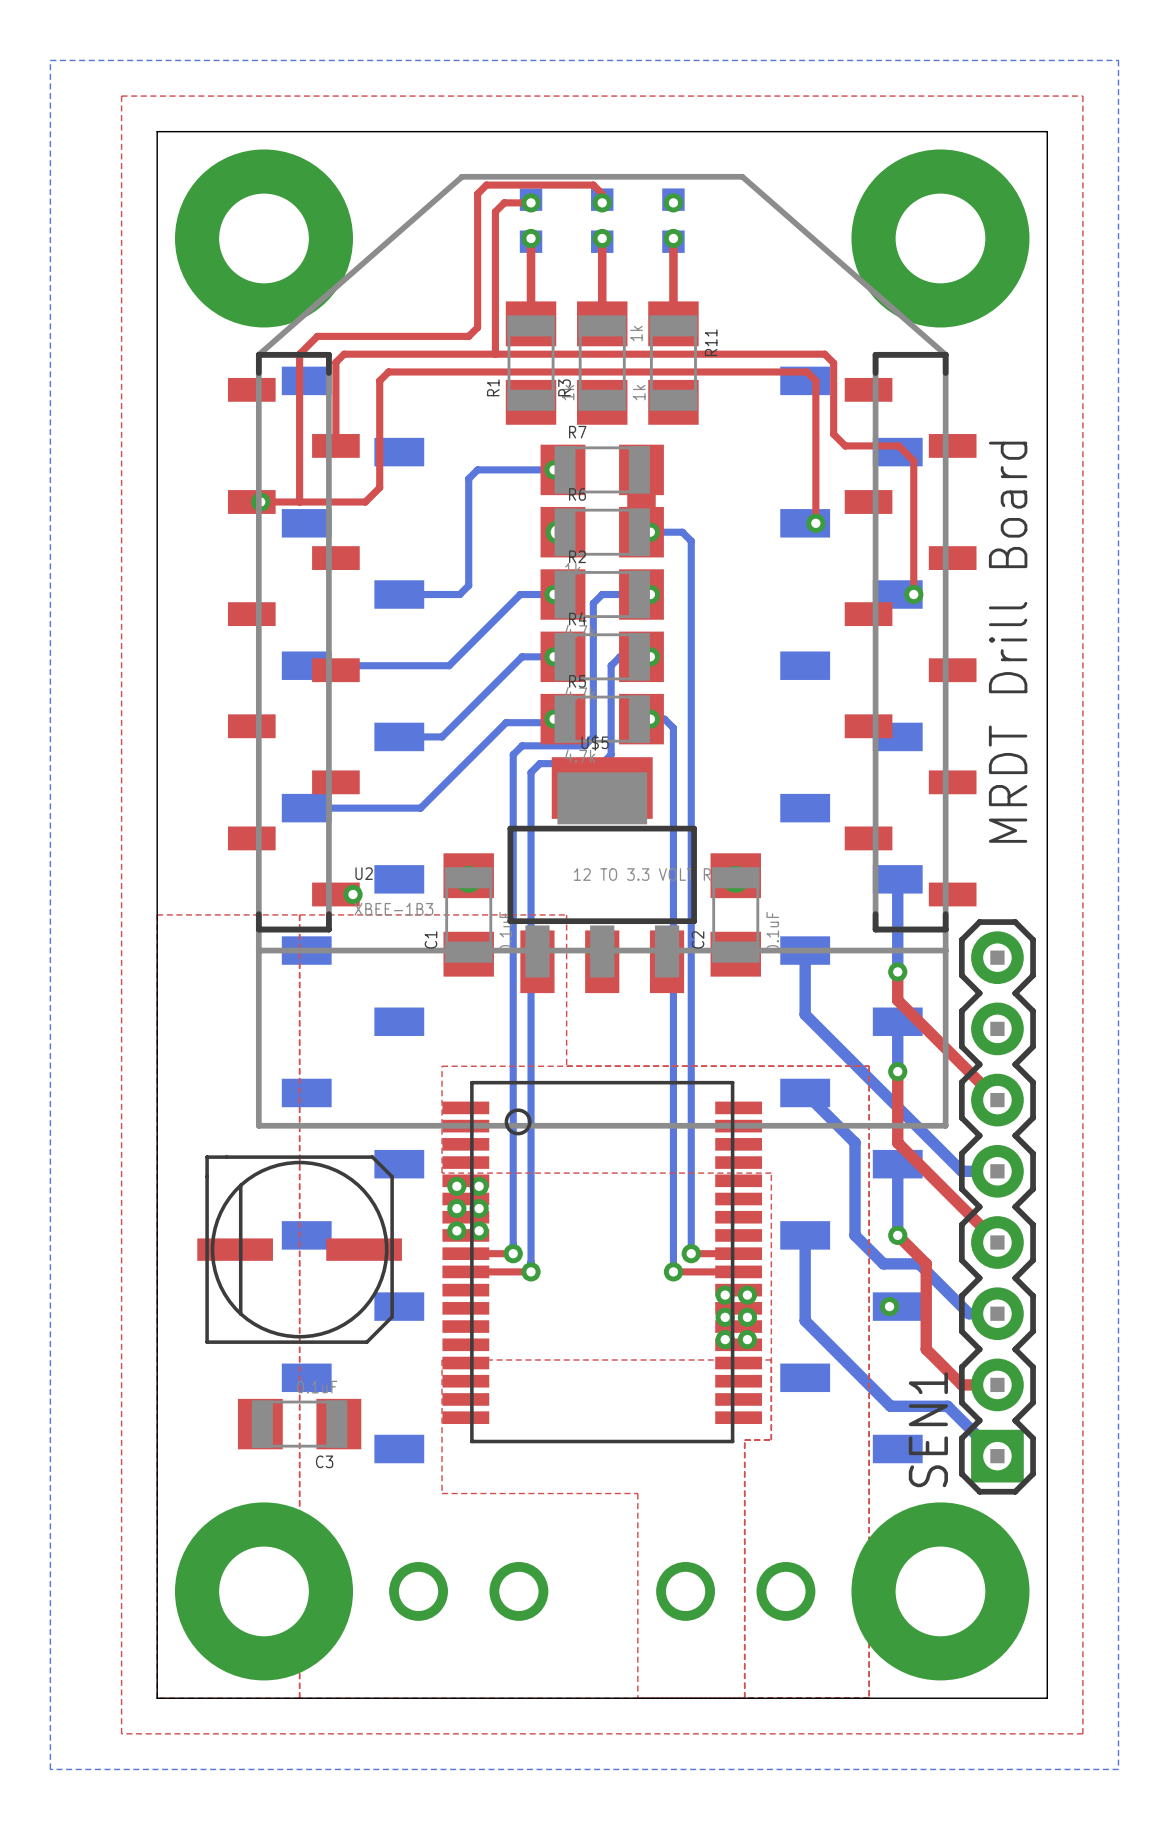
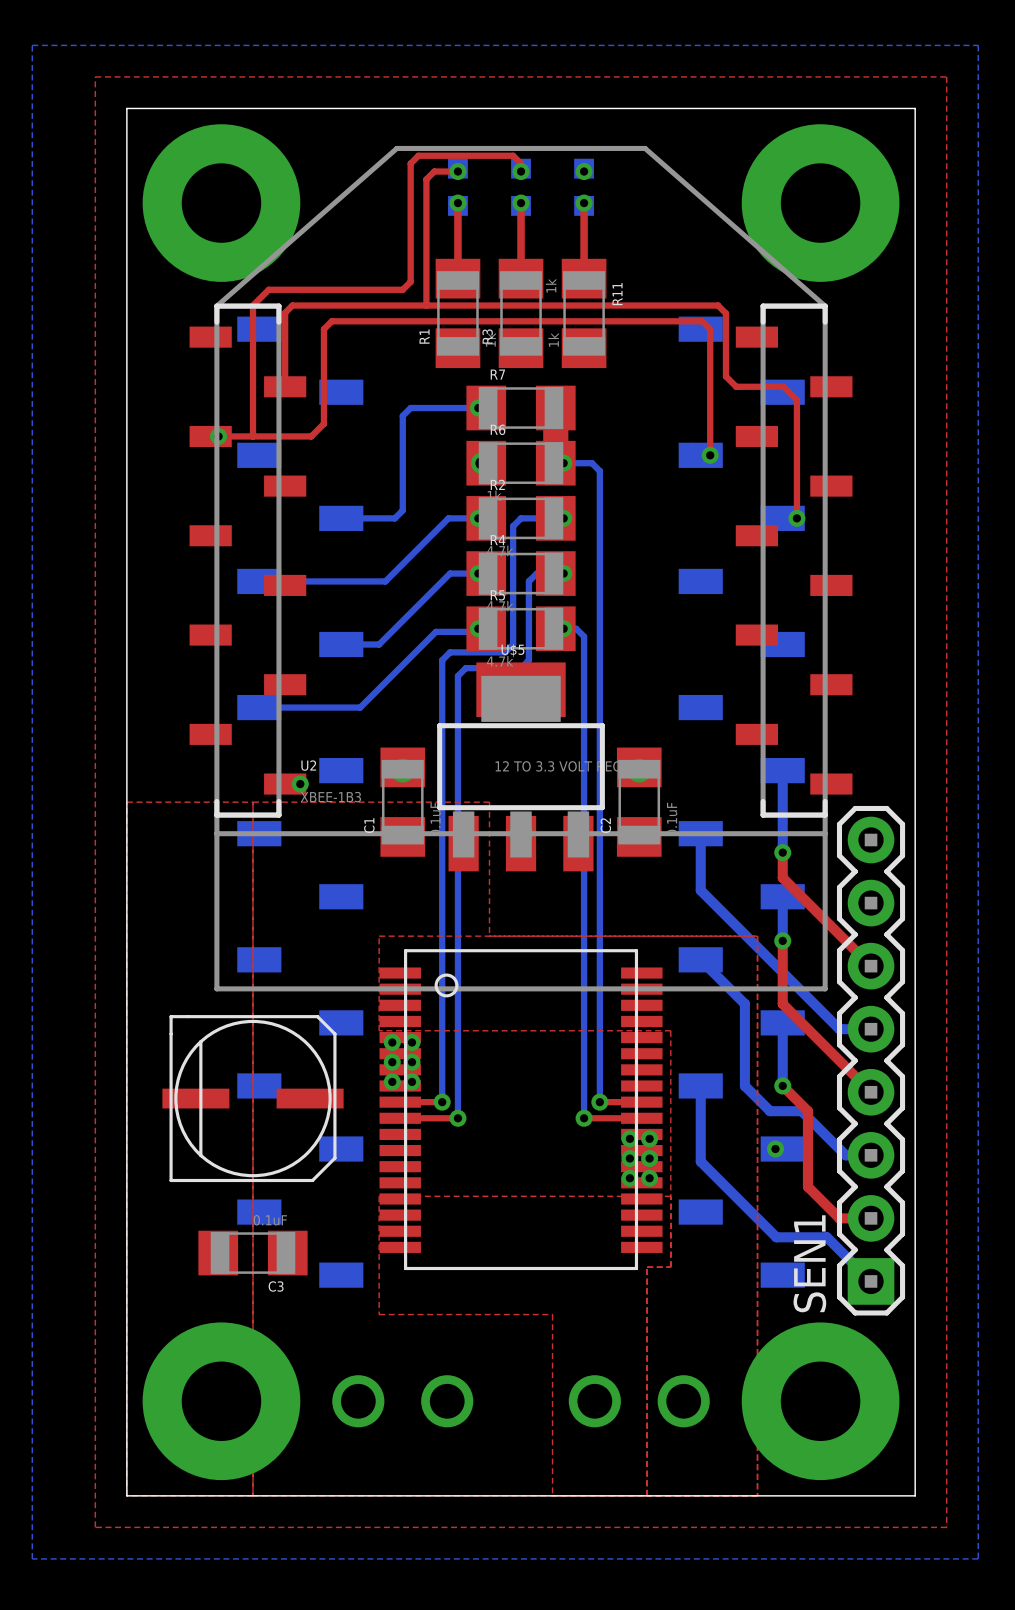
text: MRDT Drill Board (1008, 642) -> none

